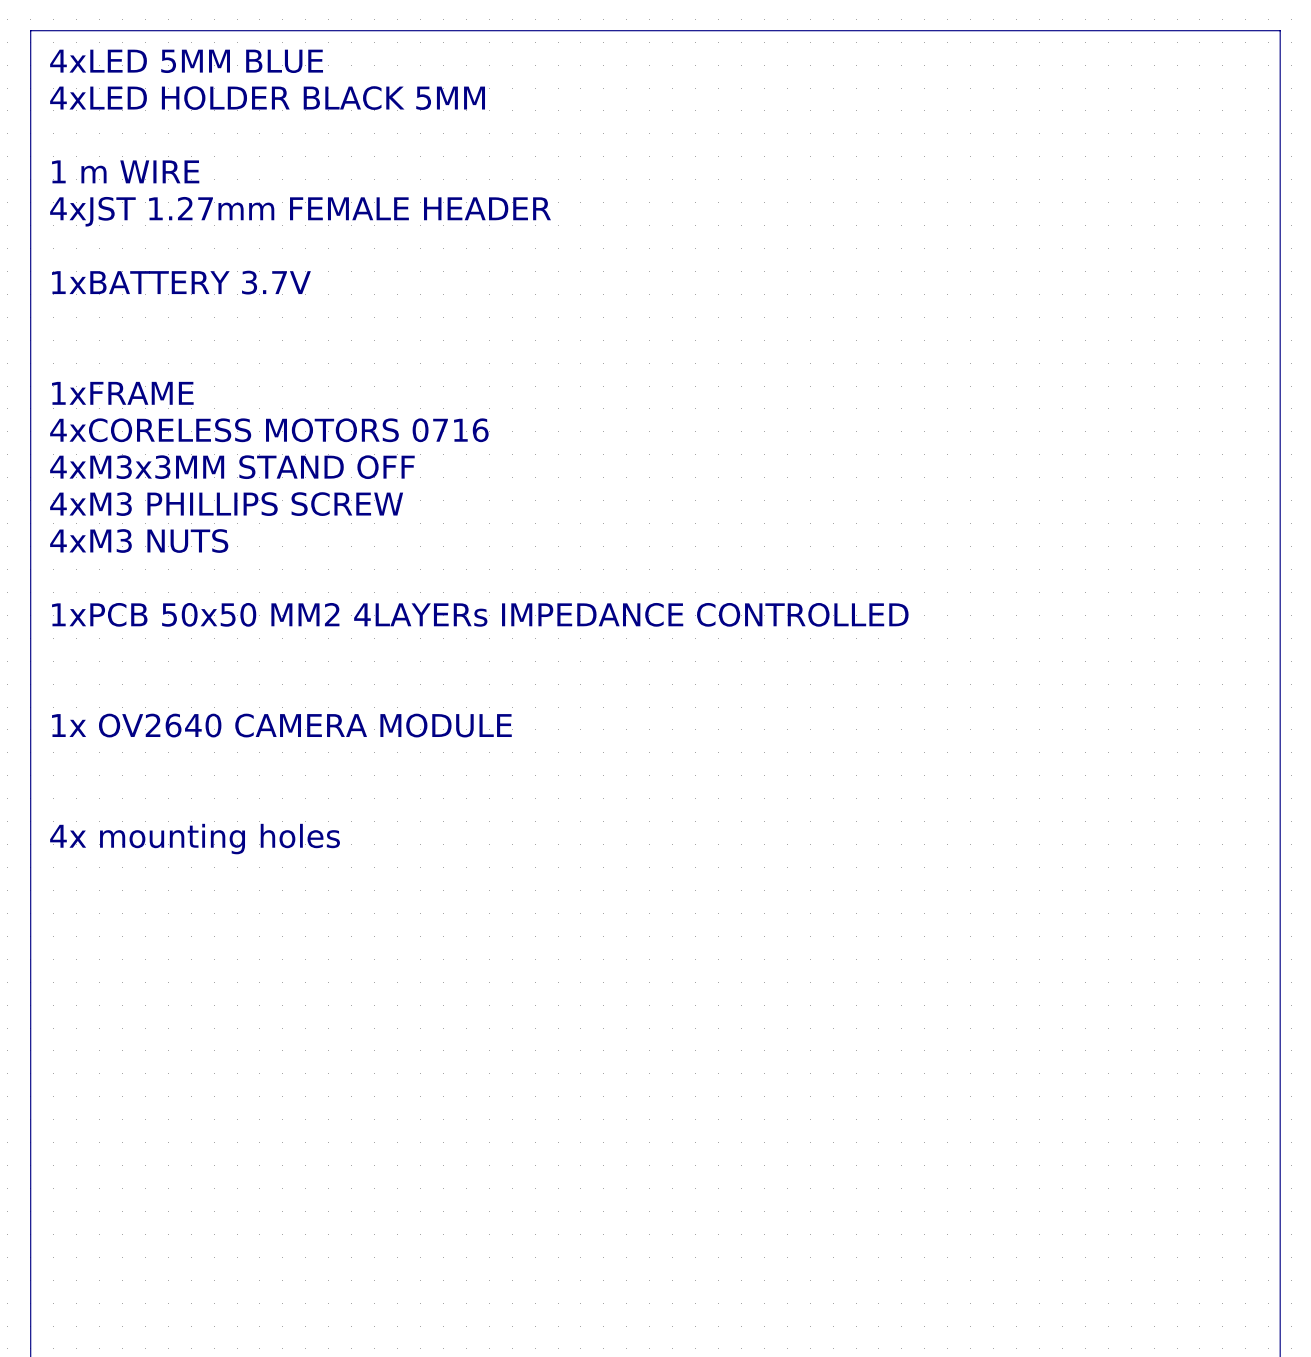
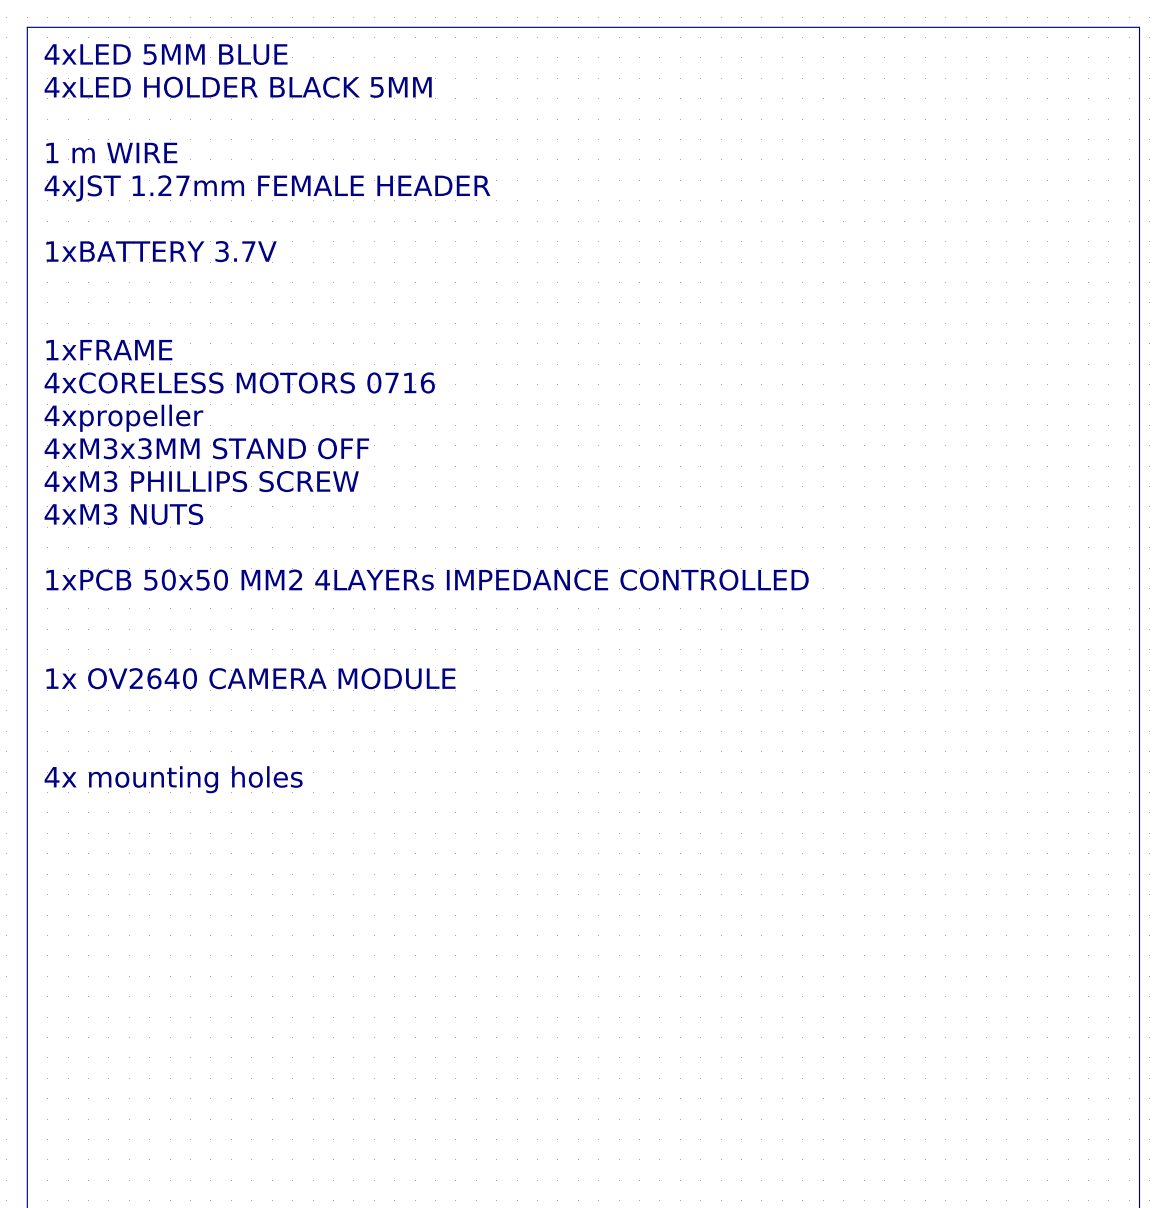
text: 4xM3x3MM STAND OFF (232, 467) -> 4xpropeller (123, 418)
text: 4xM3 PHILLIPS SCREW (226, 504) -> 4xM3x3MM STAND OFF (206, 448)
text: 4xM3 NUTS (139, 541) -> 4xM3 PHILLIPS SCREW (201, 481)
text: none -> 4xM3 NUTS (123, 514)
text position: 1xPCB 50x50 MM2 4LAYERs IMPEDANCE CONTROLLED (480, 614) -> 1xPCB 50x50 MM2 4LAYERs IMPEDANCE CONTROLLED (427, 580)
text position: 1x OV2640 CAMERA MODULE (281, 725) -> 1x OV2640 CAMERA MODULE (250, 678)
text position: 4x mounting holes (195, 839) -> 4x mounting holes (173, 779)

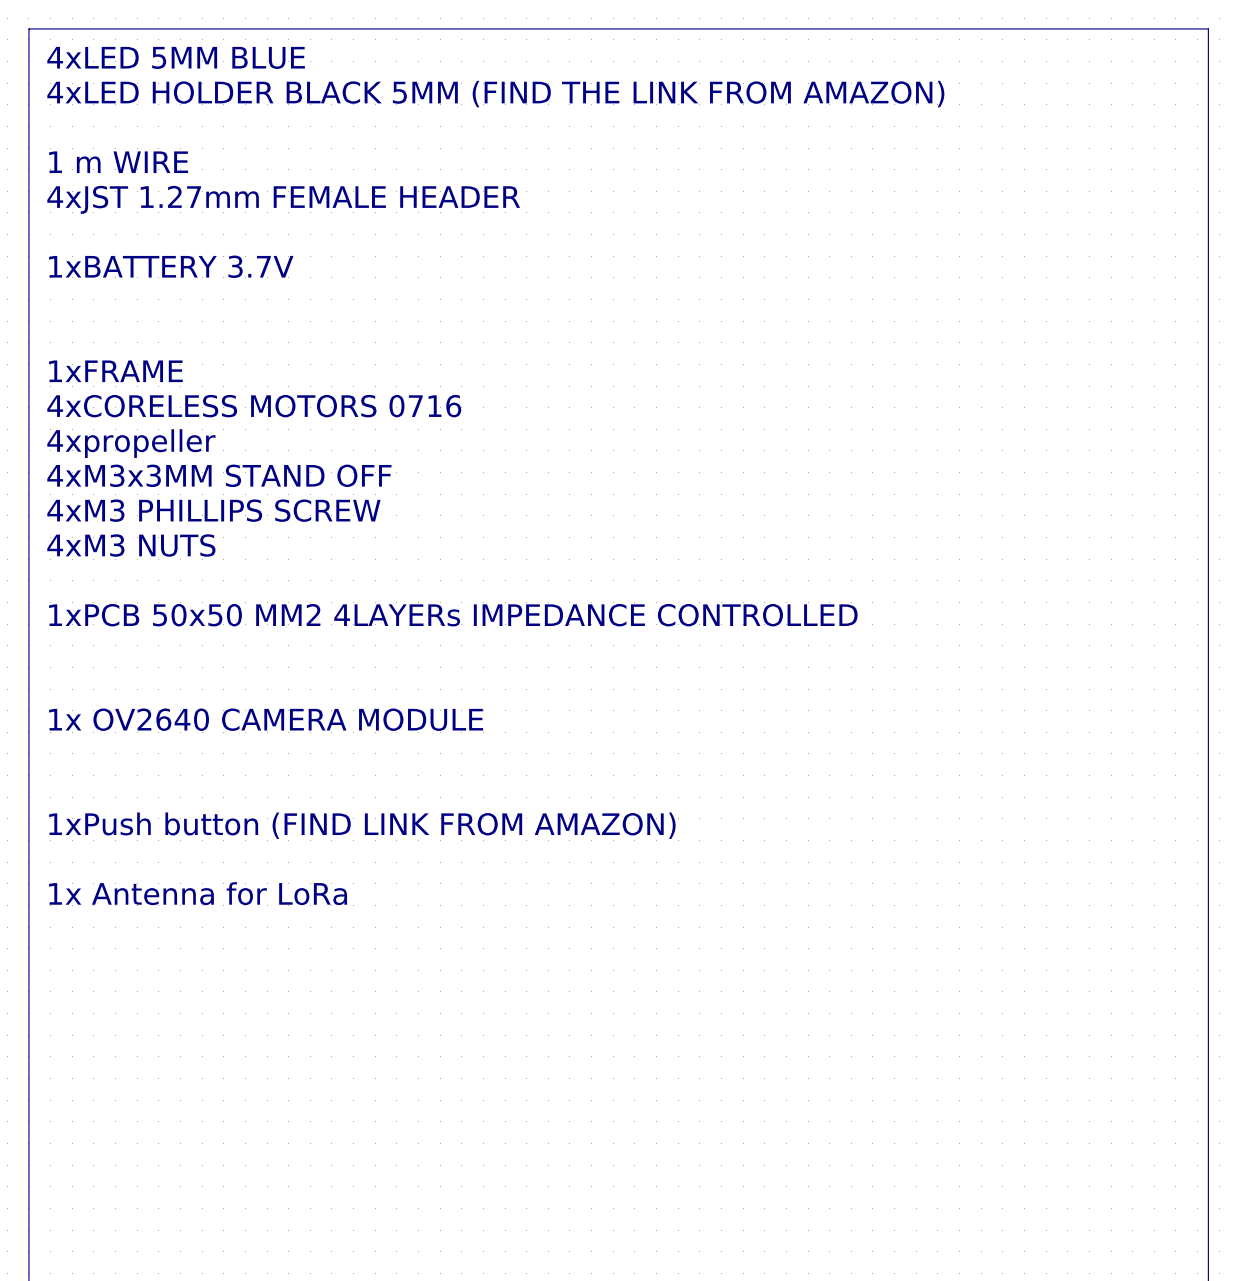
text: 4xLED HOLDER BLACK 5MM (238, 87) -> 4xLED HOLDER BLACK 5MM (FIND THE LINK FROM AMAZON) (495, 94)
text: 4x mounting holes (173, 779) -> 1xPush button (FIND LINK FROM AMAZON) (362, 825)
text: none -> 1x Antenna for LoRa (198, 893)

